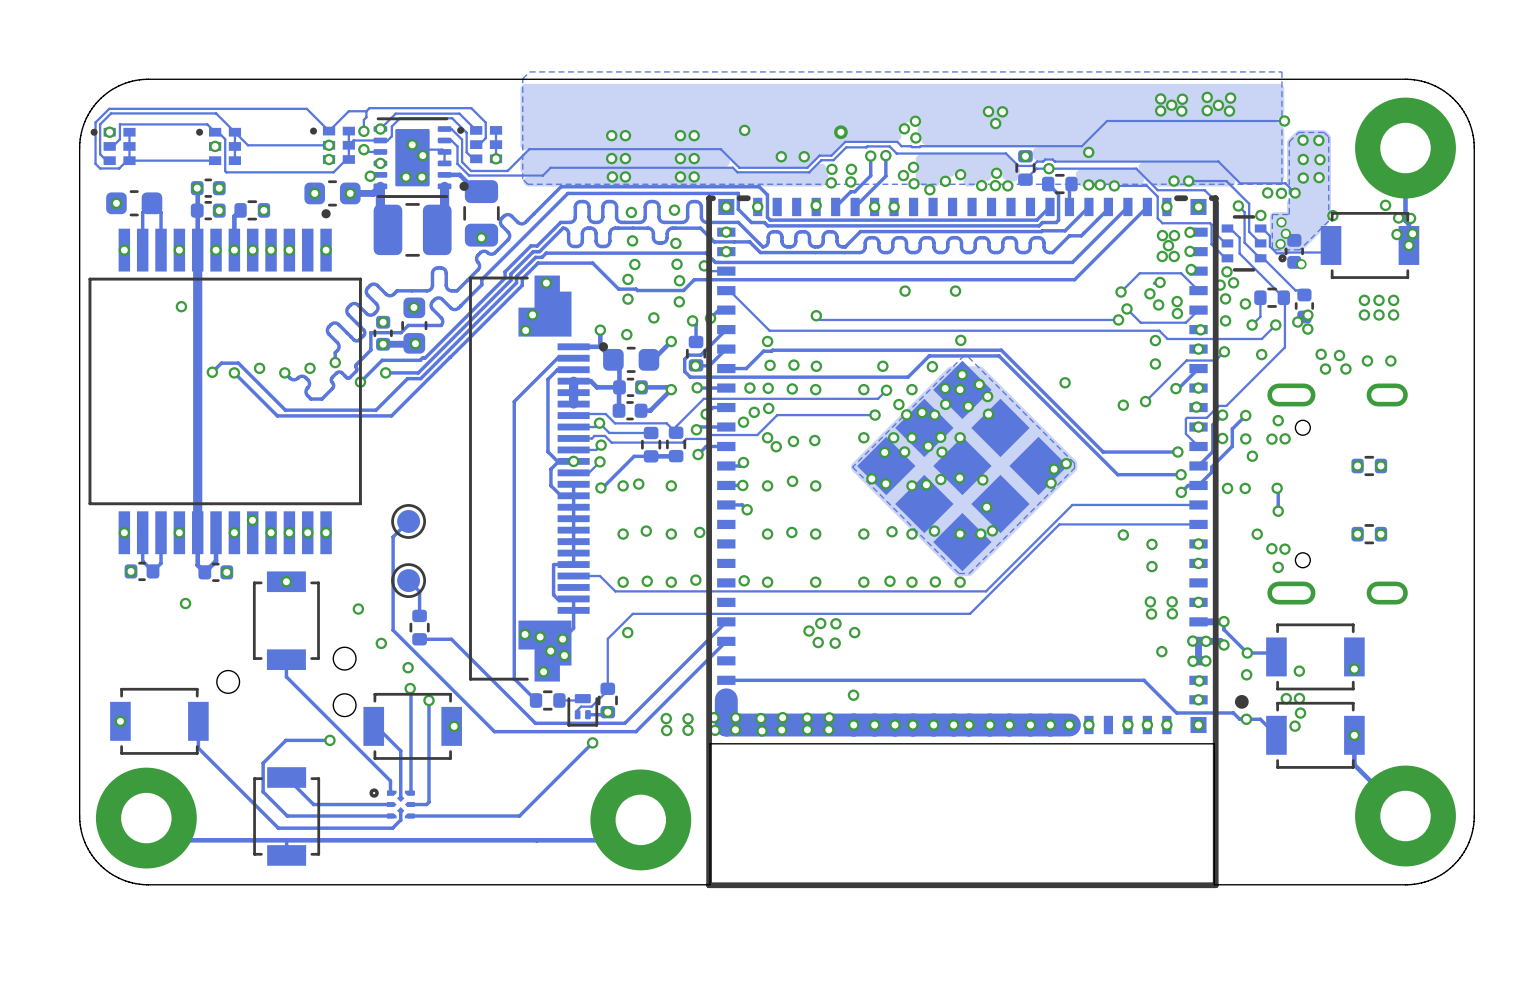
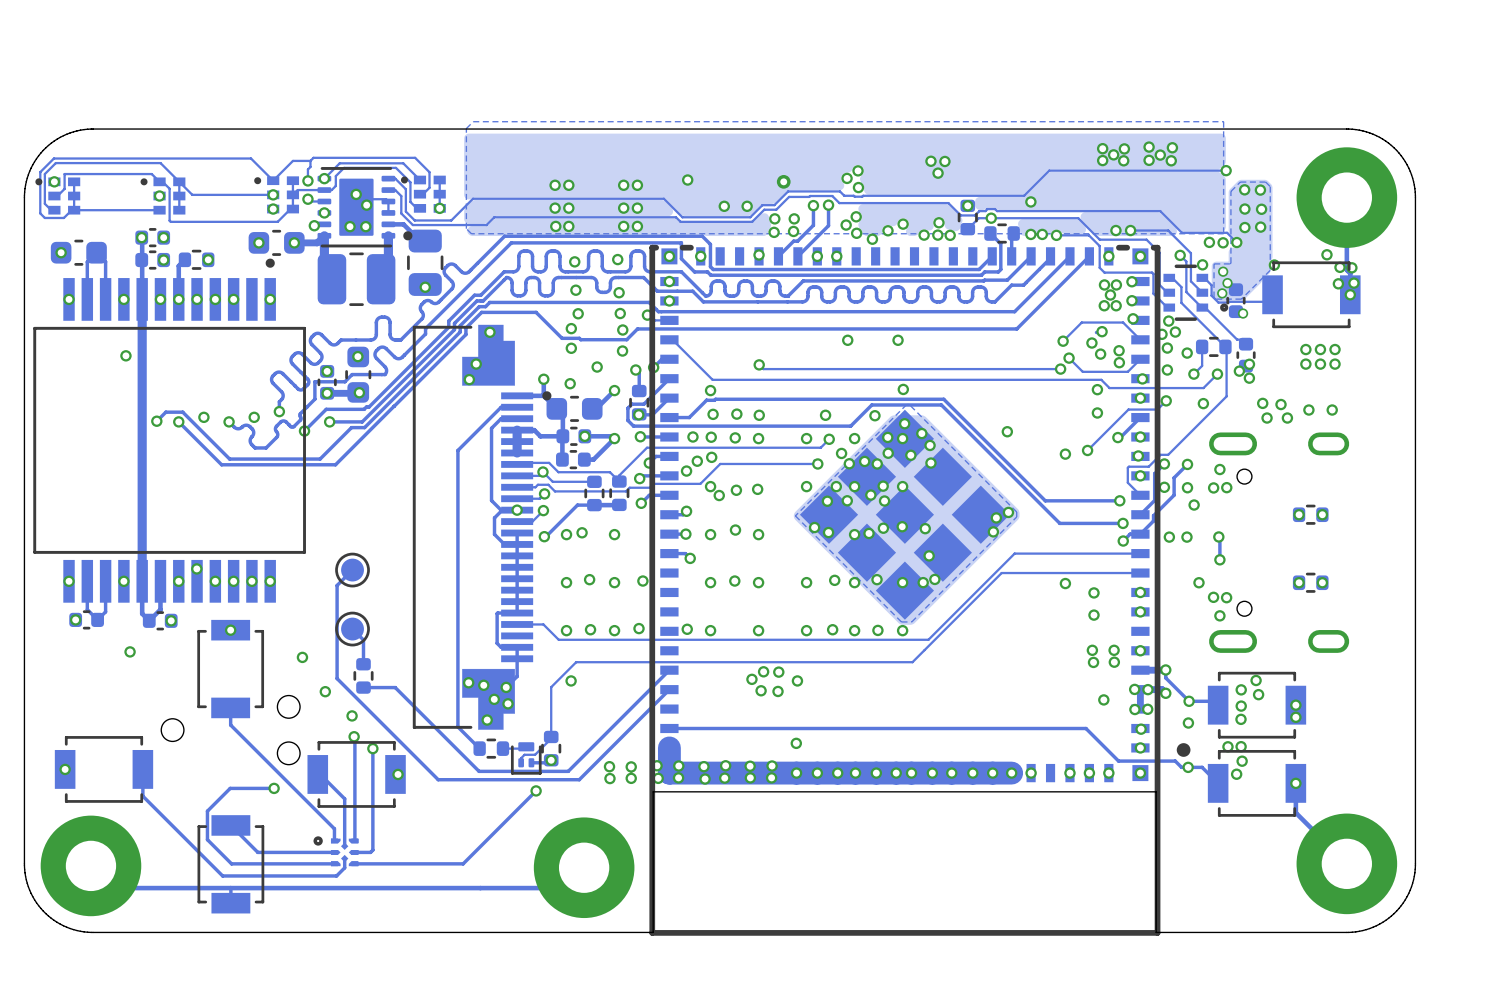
via: none -> (1256, 680)
via: none -> (1241, 689)
via: none -> (1258, 694)
via: none -> (1295, 705)
via: none -> (1241, 706)

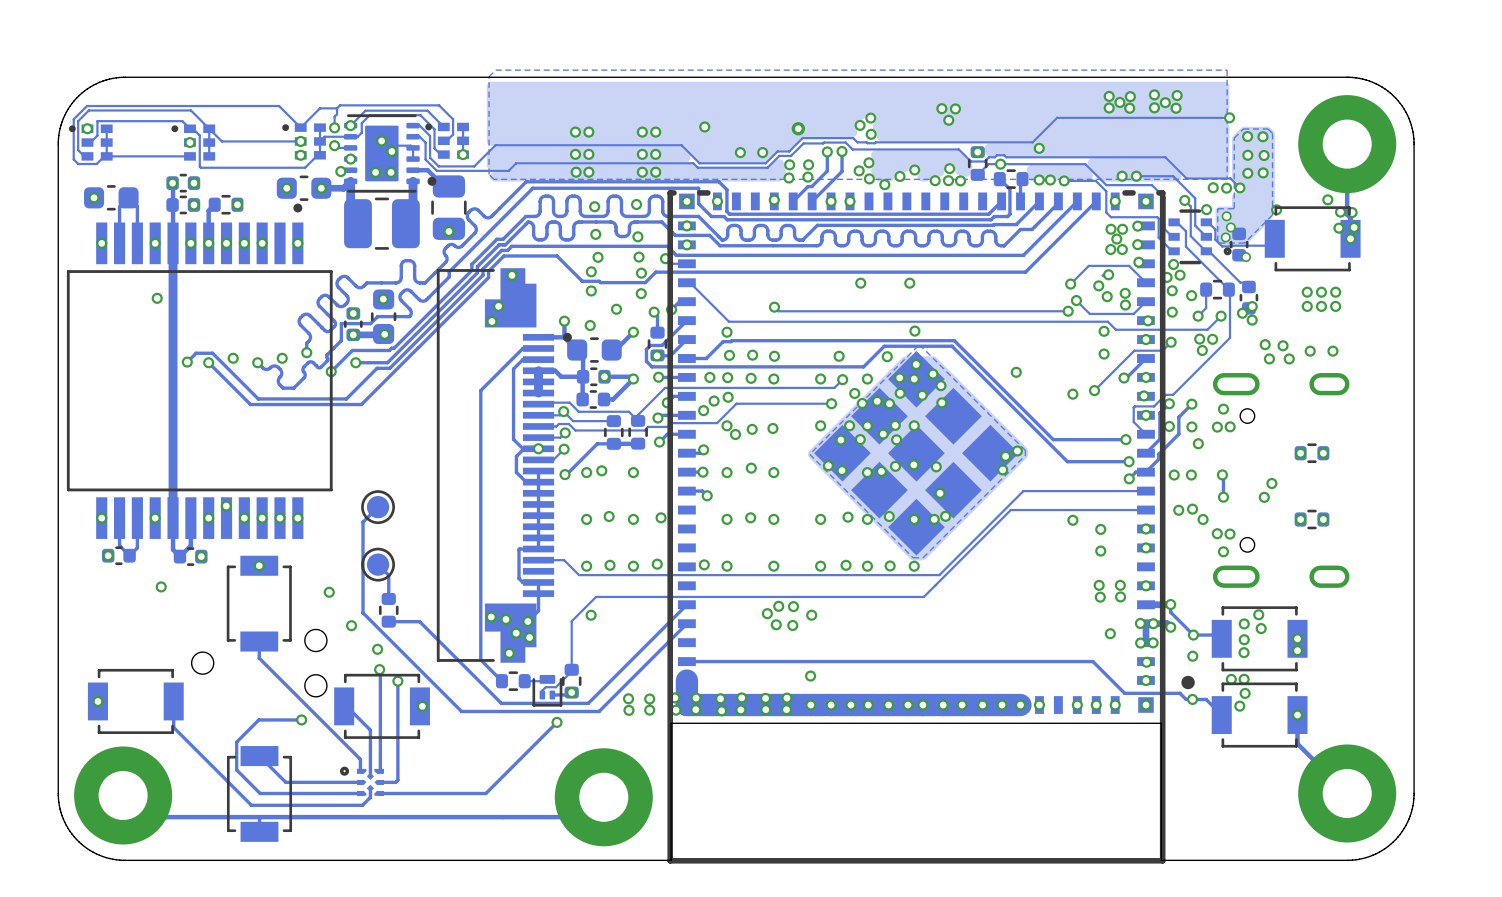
via: none -> (1199, 339)
via: none -> (1212, 339)
via: (1203, 403) -> none
via: none -> (1202, 350)
via: none -> (1271, 483)
via: none -> (1264, 497)
via: none -> (1192, 509)
via: none -> (1178, 510)

